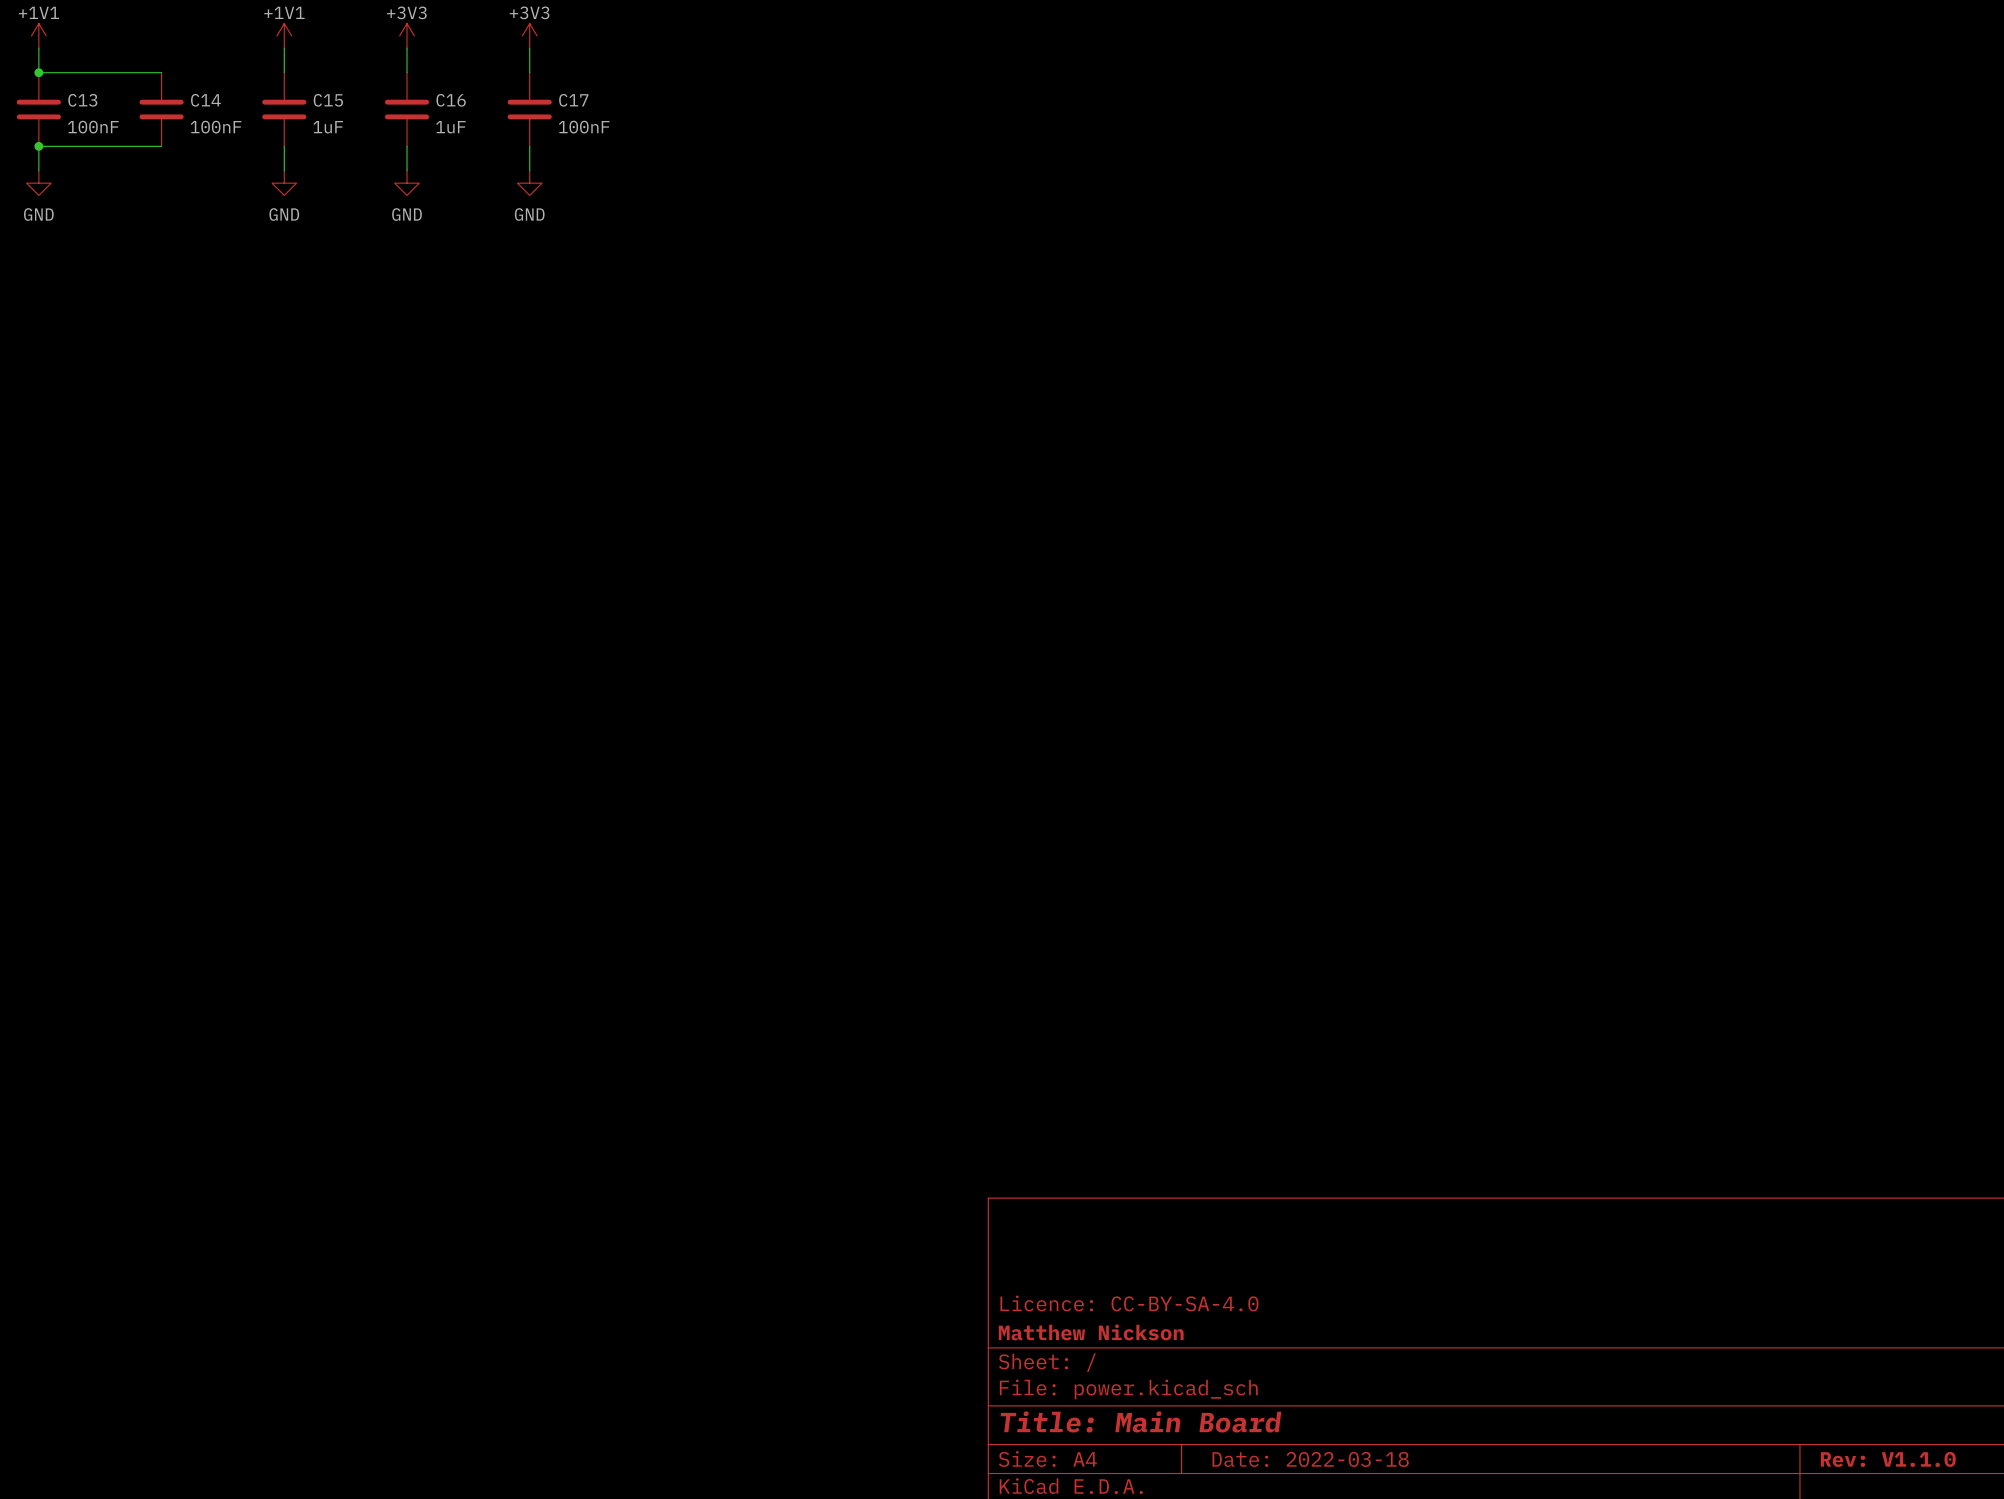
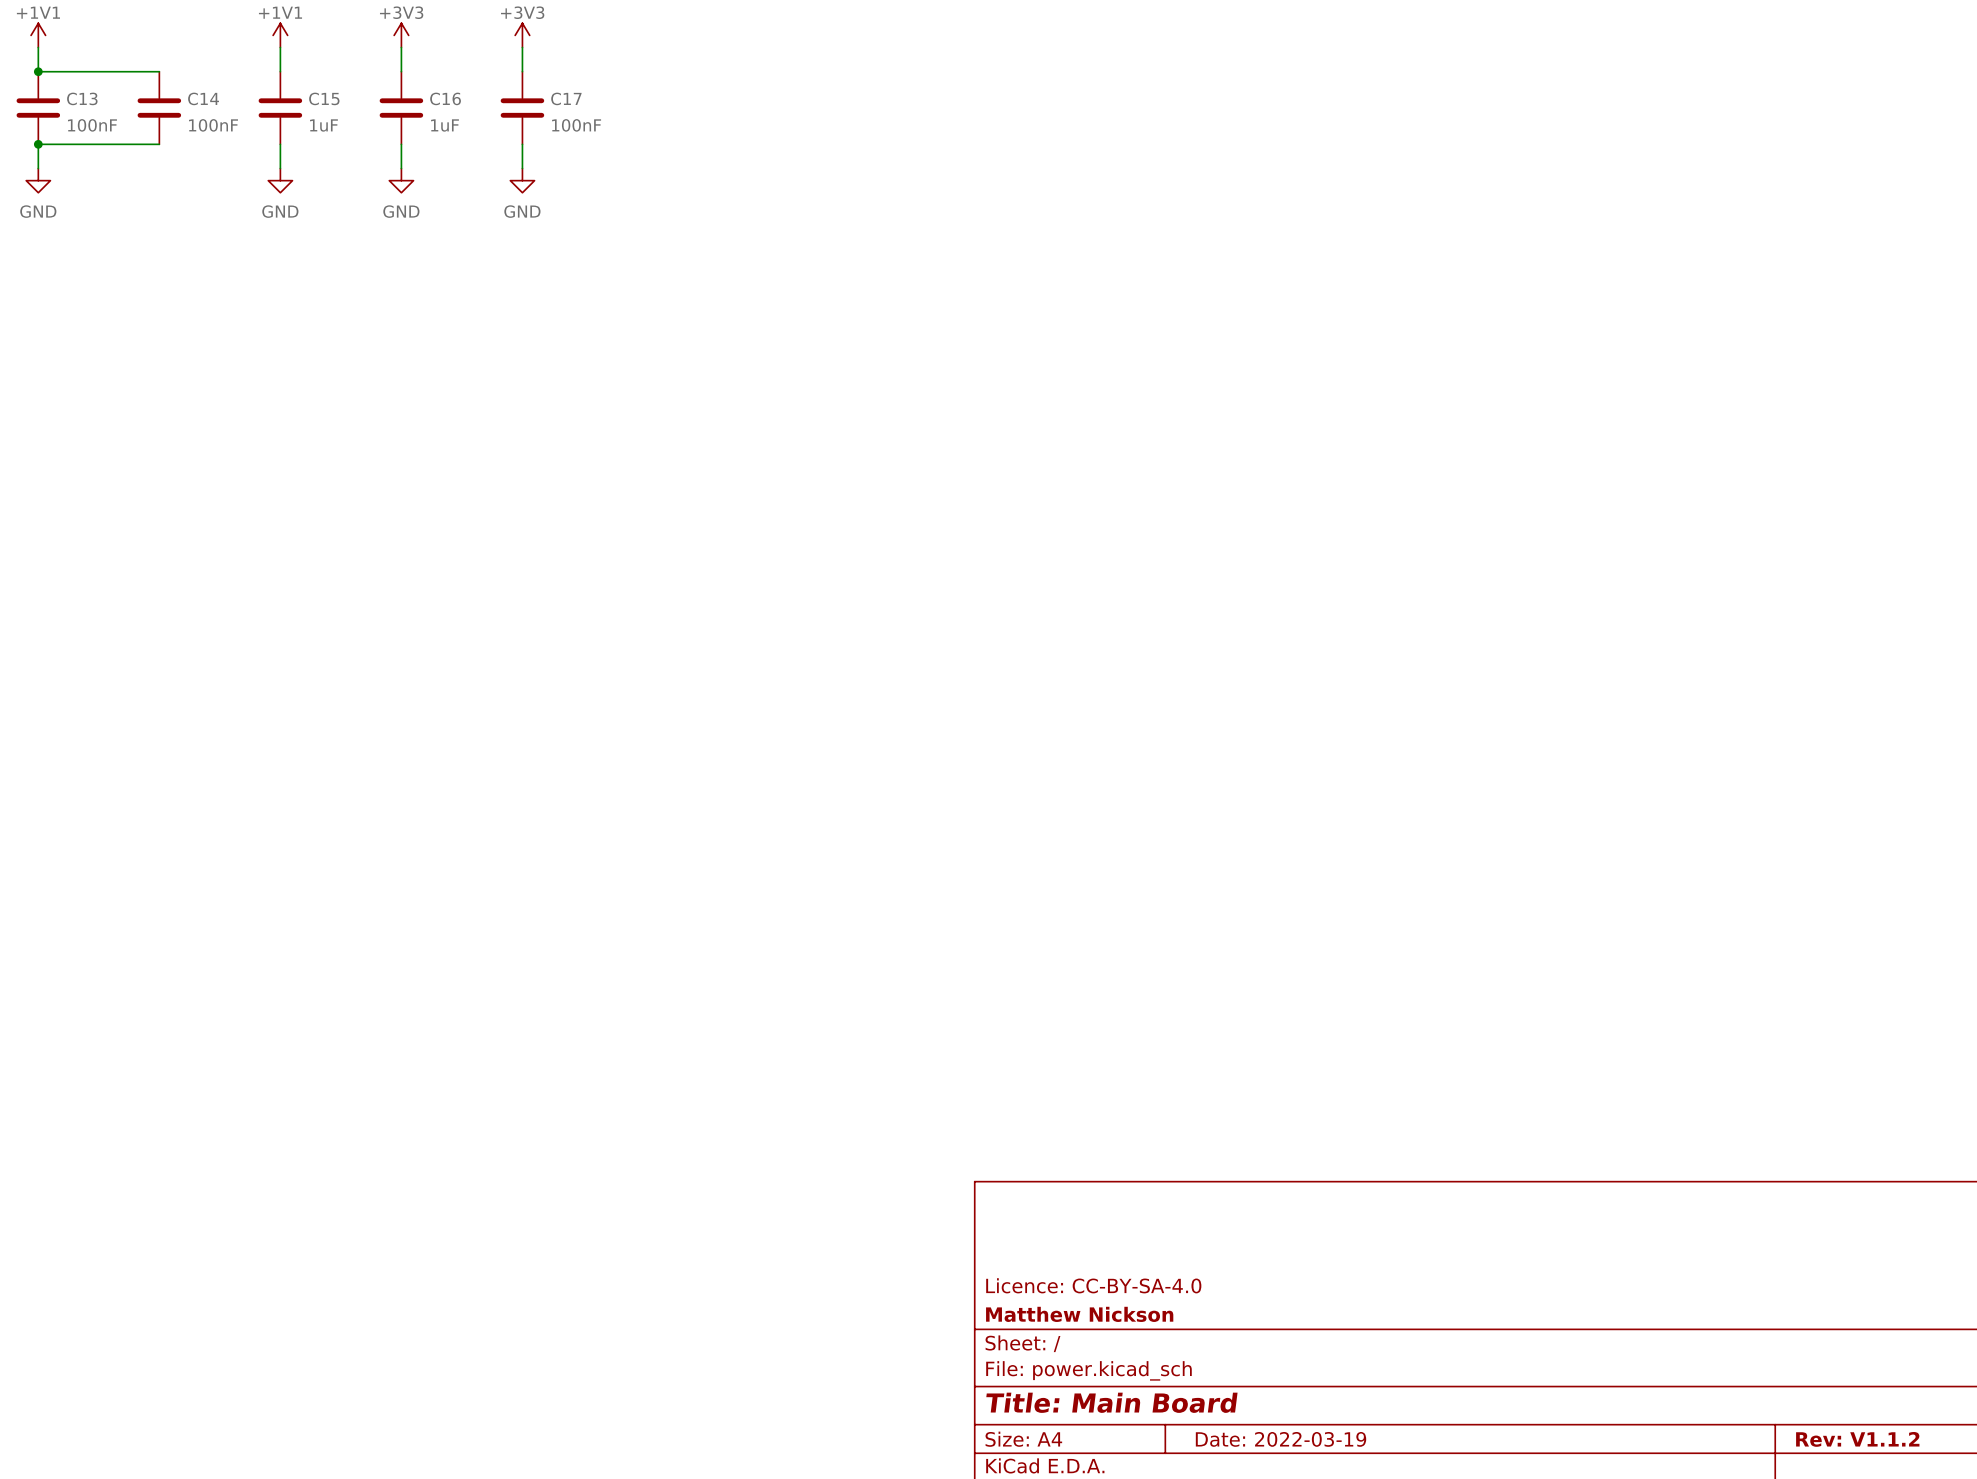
title block: Date: 2022-03-18 (1310, 1459) -> Date: 2022-03-19 (1281, 1439)
title block: Rev: V1.1.0 (1888, 1459) -> Rev: V1.1.2 (1857, 1439)

